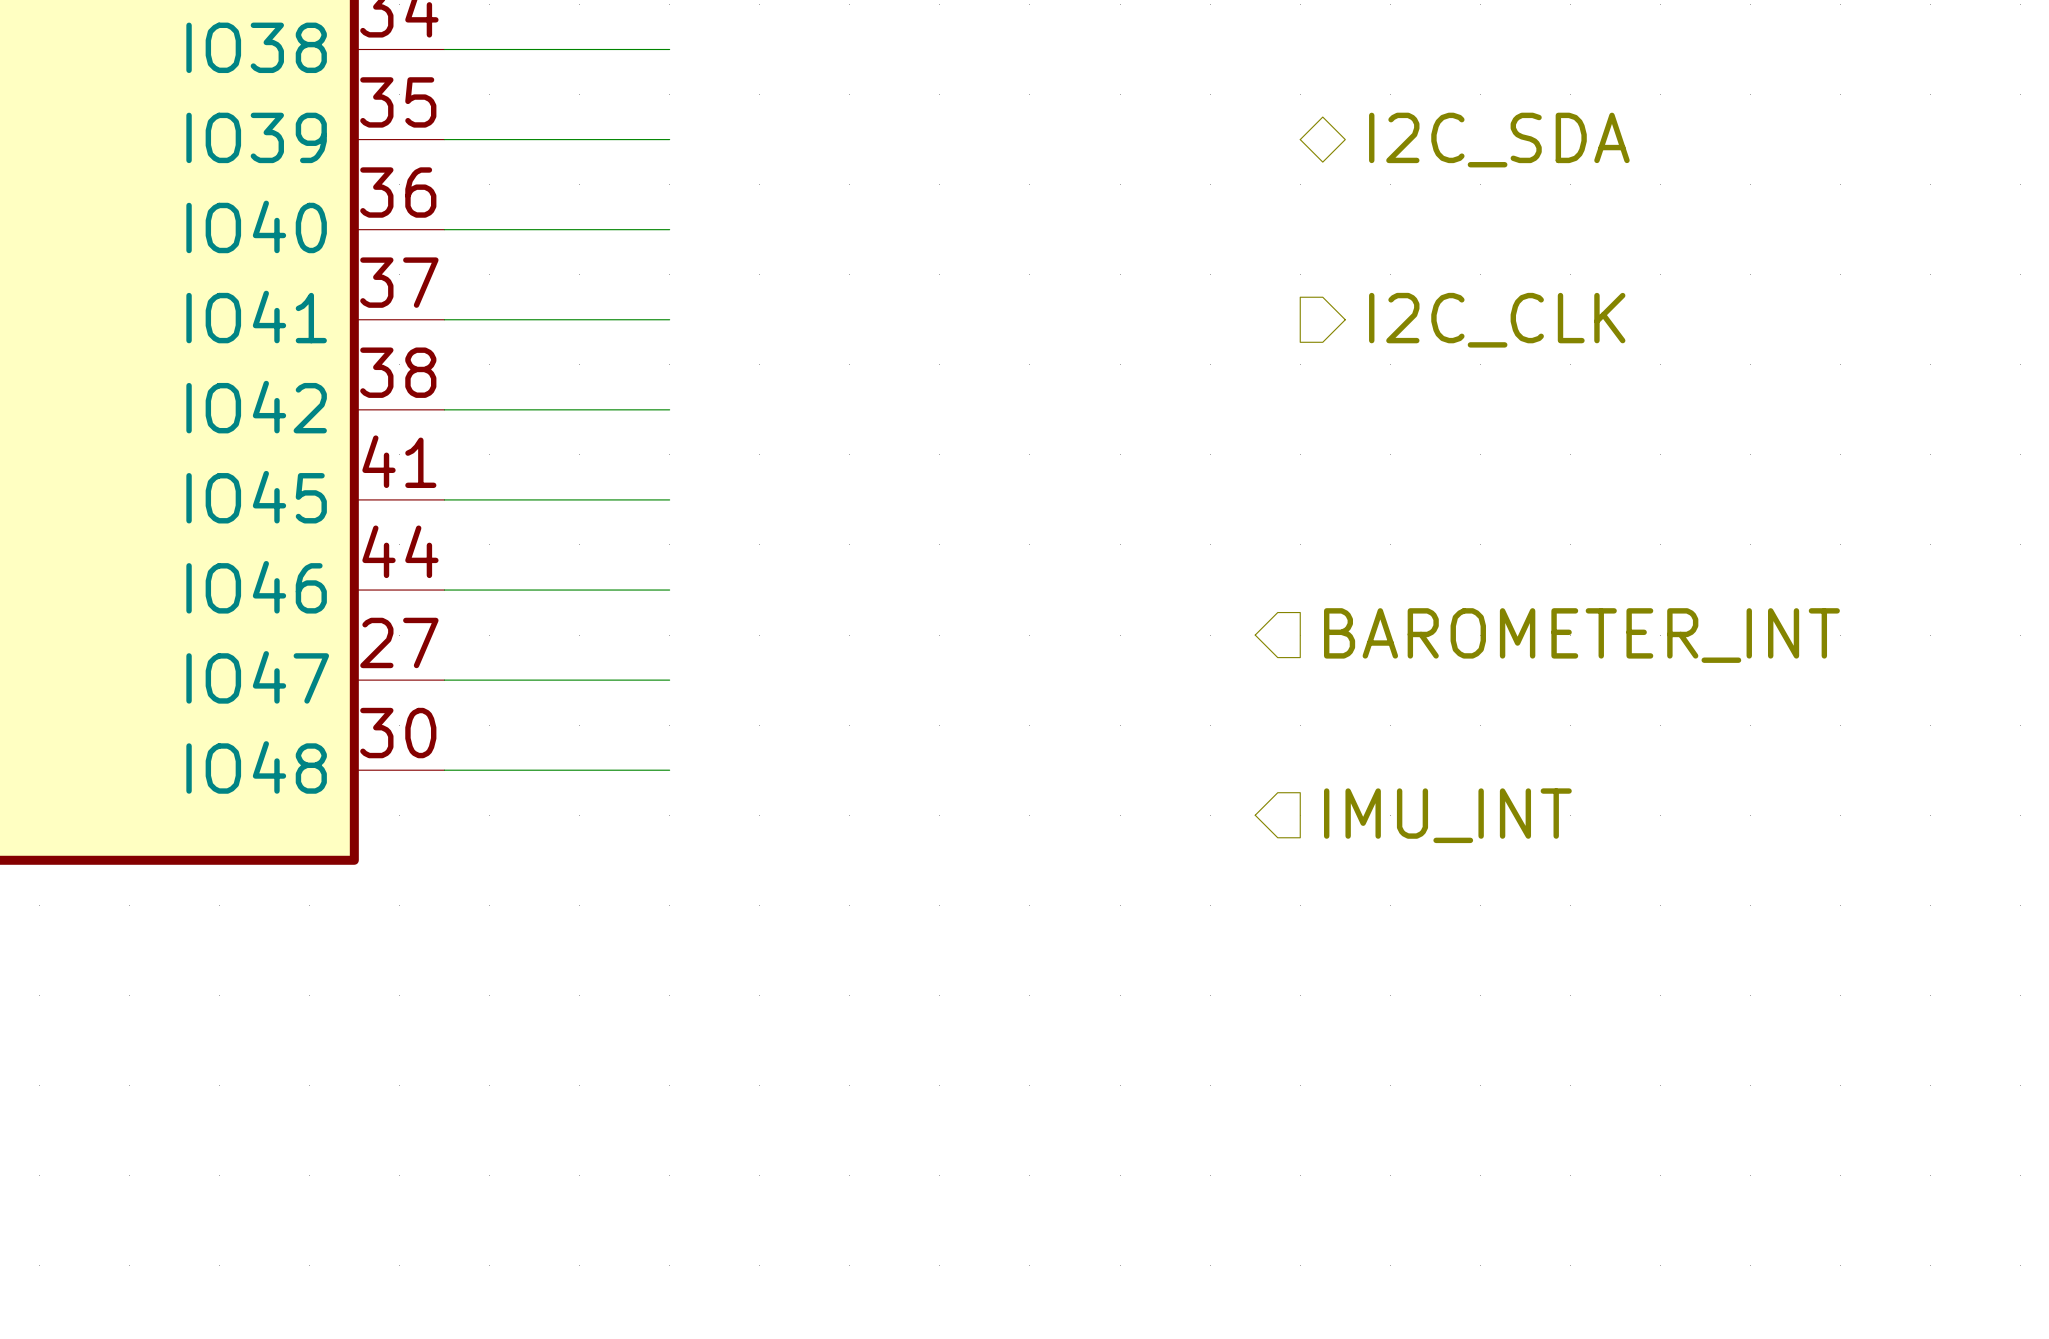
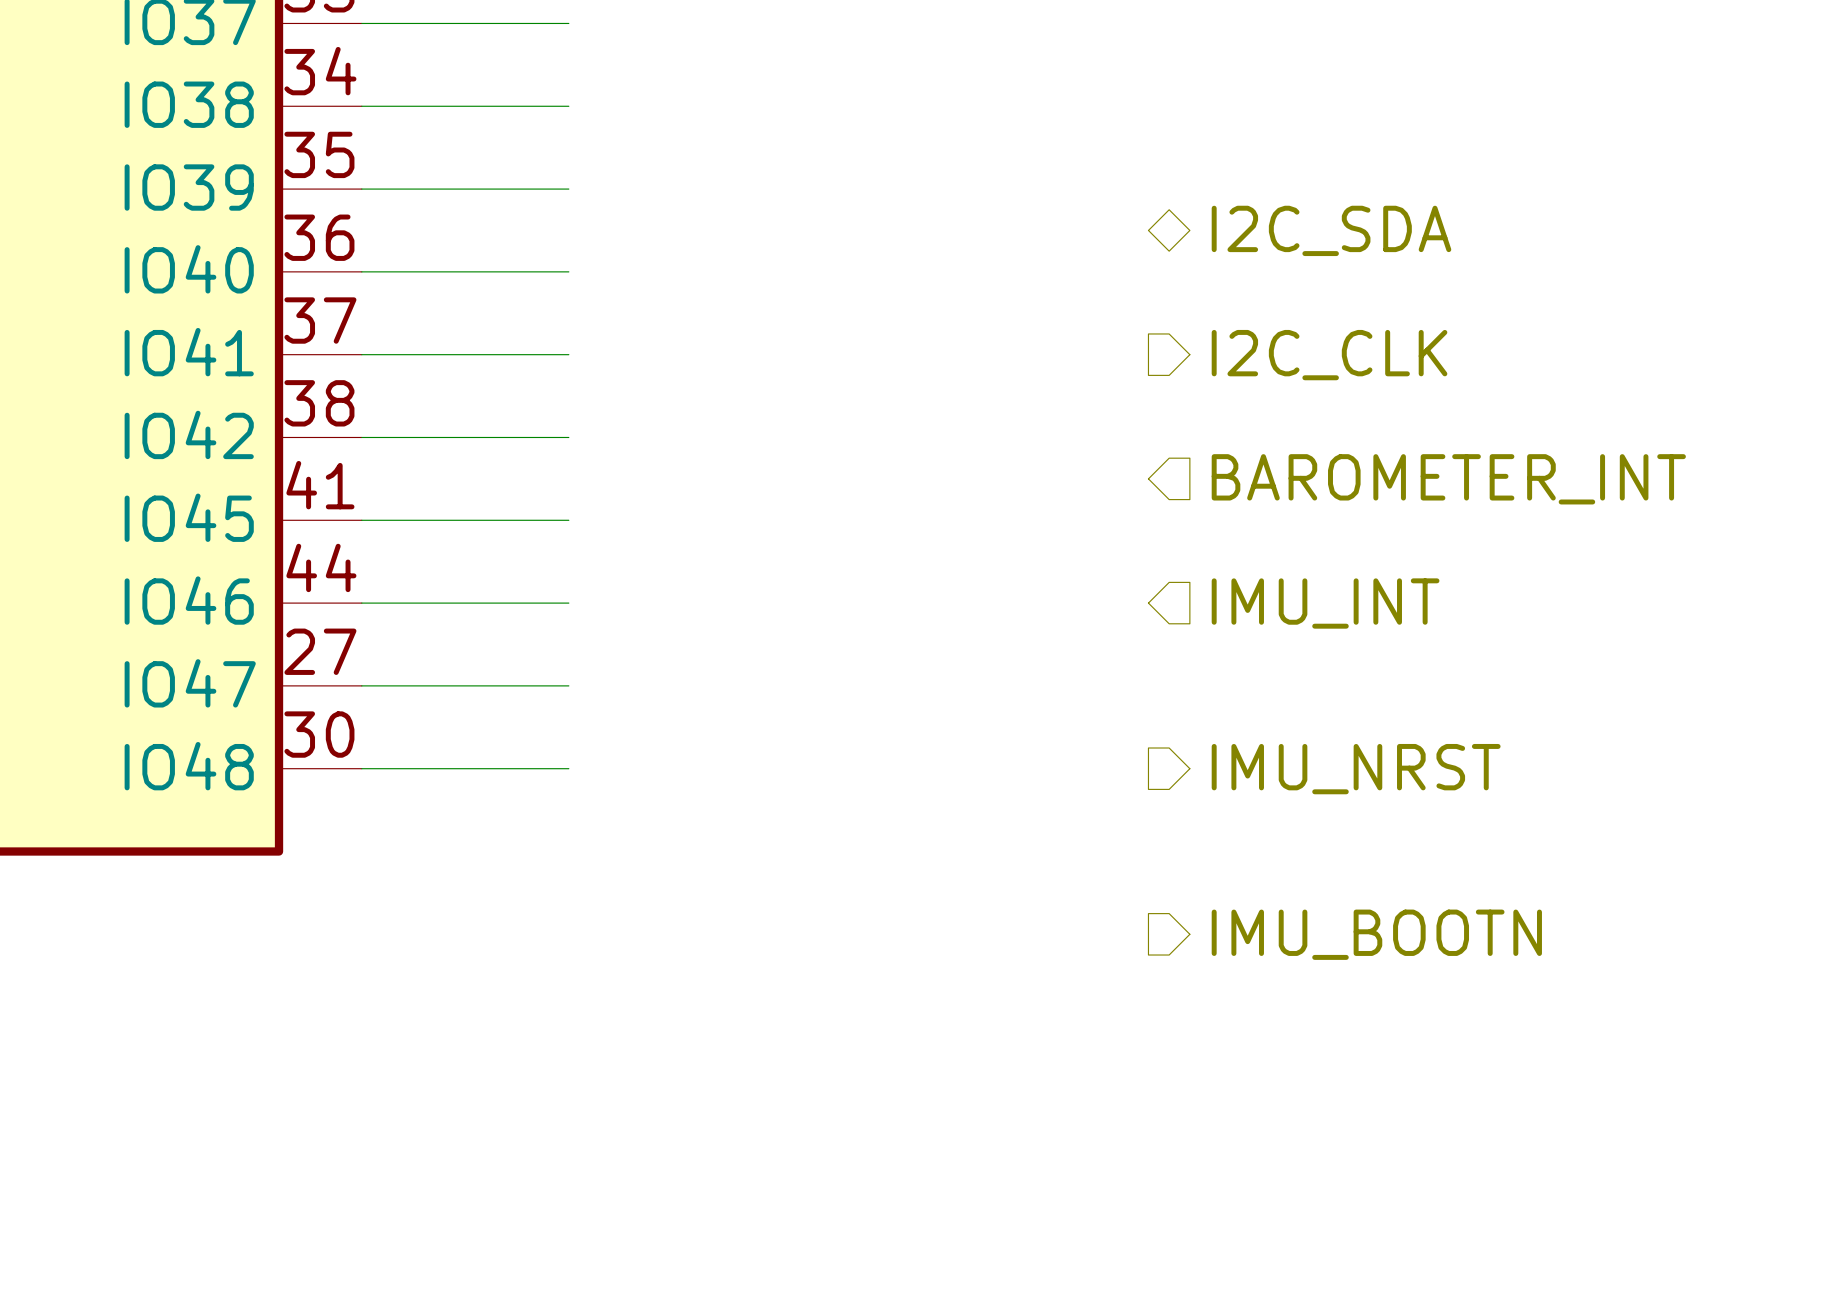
hierarchical label position: I2C_SDA (1499, 140) -> I2C_SDA (1331, 230)
hierarchical label position: BAROMETER_INT (1581, 635) -> BAROMETER_INT (1448, 479)
hierarchical label: none -> IMU_NRST (1356, 769)
hierarchical label position: IMU_INT (1447, 815) -> IMU_INT (1325, 603)
hierarchical label: none -> IMU_BOOTN (1376, 934)

